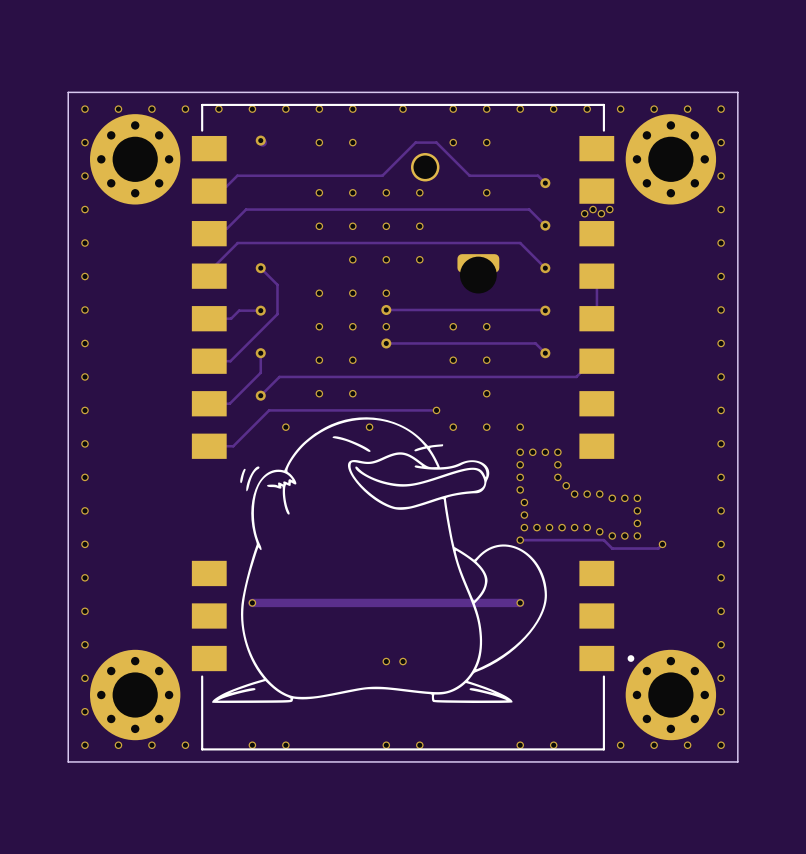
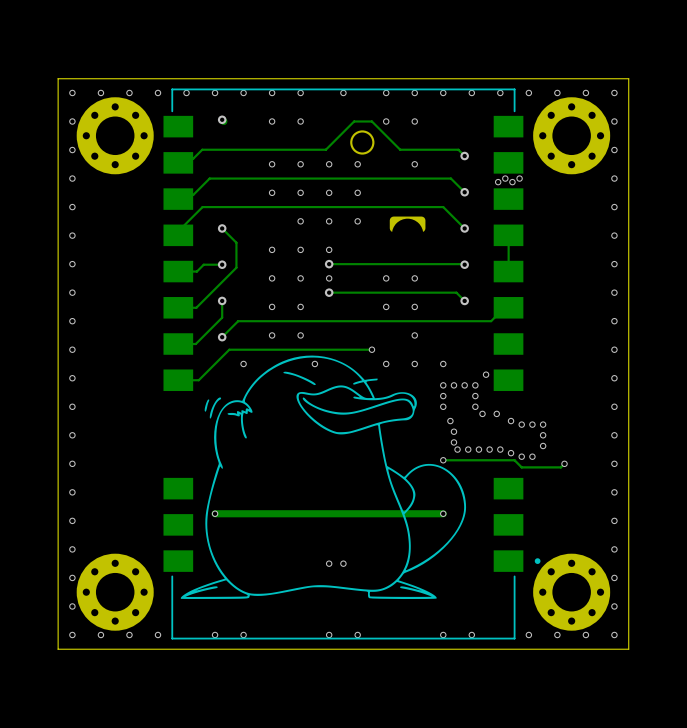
via: none -> (486, 374)
via: none -> (496, 413)
via: (520, 489) -> none
via: none -> (450, 421)
via: (574, 494) -> none
via: (587, 494) -> none
via: (524, 502) -> none
via: none -> (453, 431)
via: (524, 515) -> none
via: none -> (453, 442)
via: (524, 527) -> none
via: (637, 535) -> none

